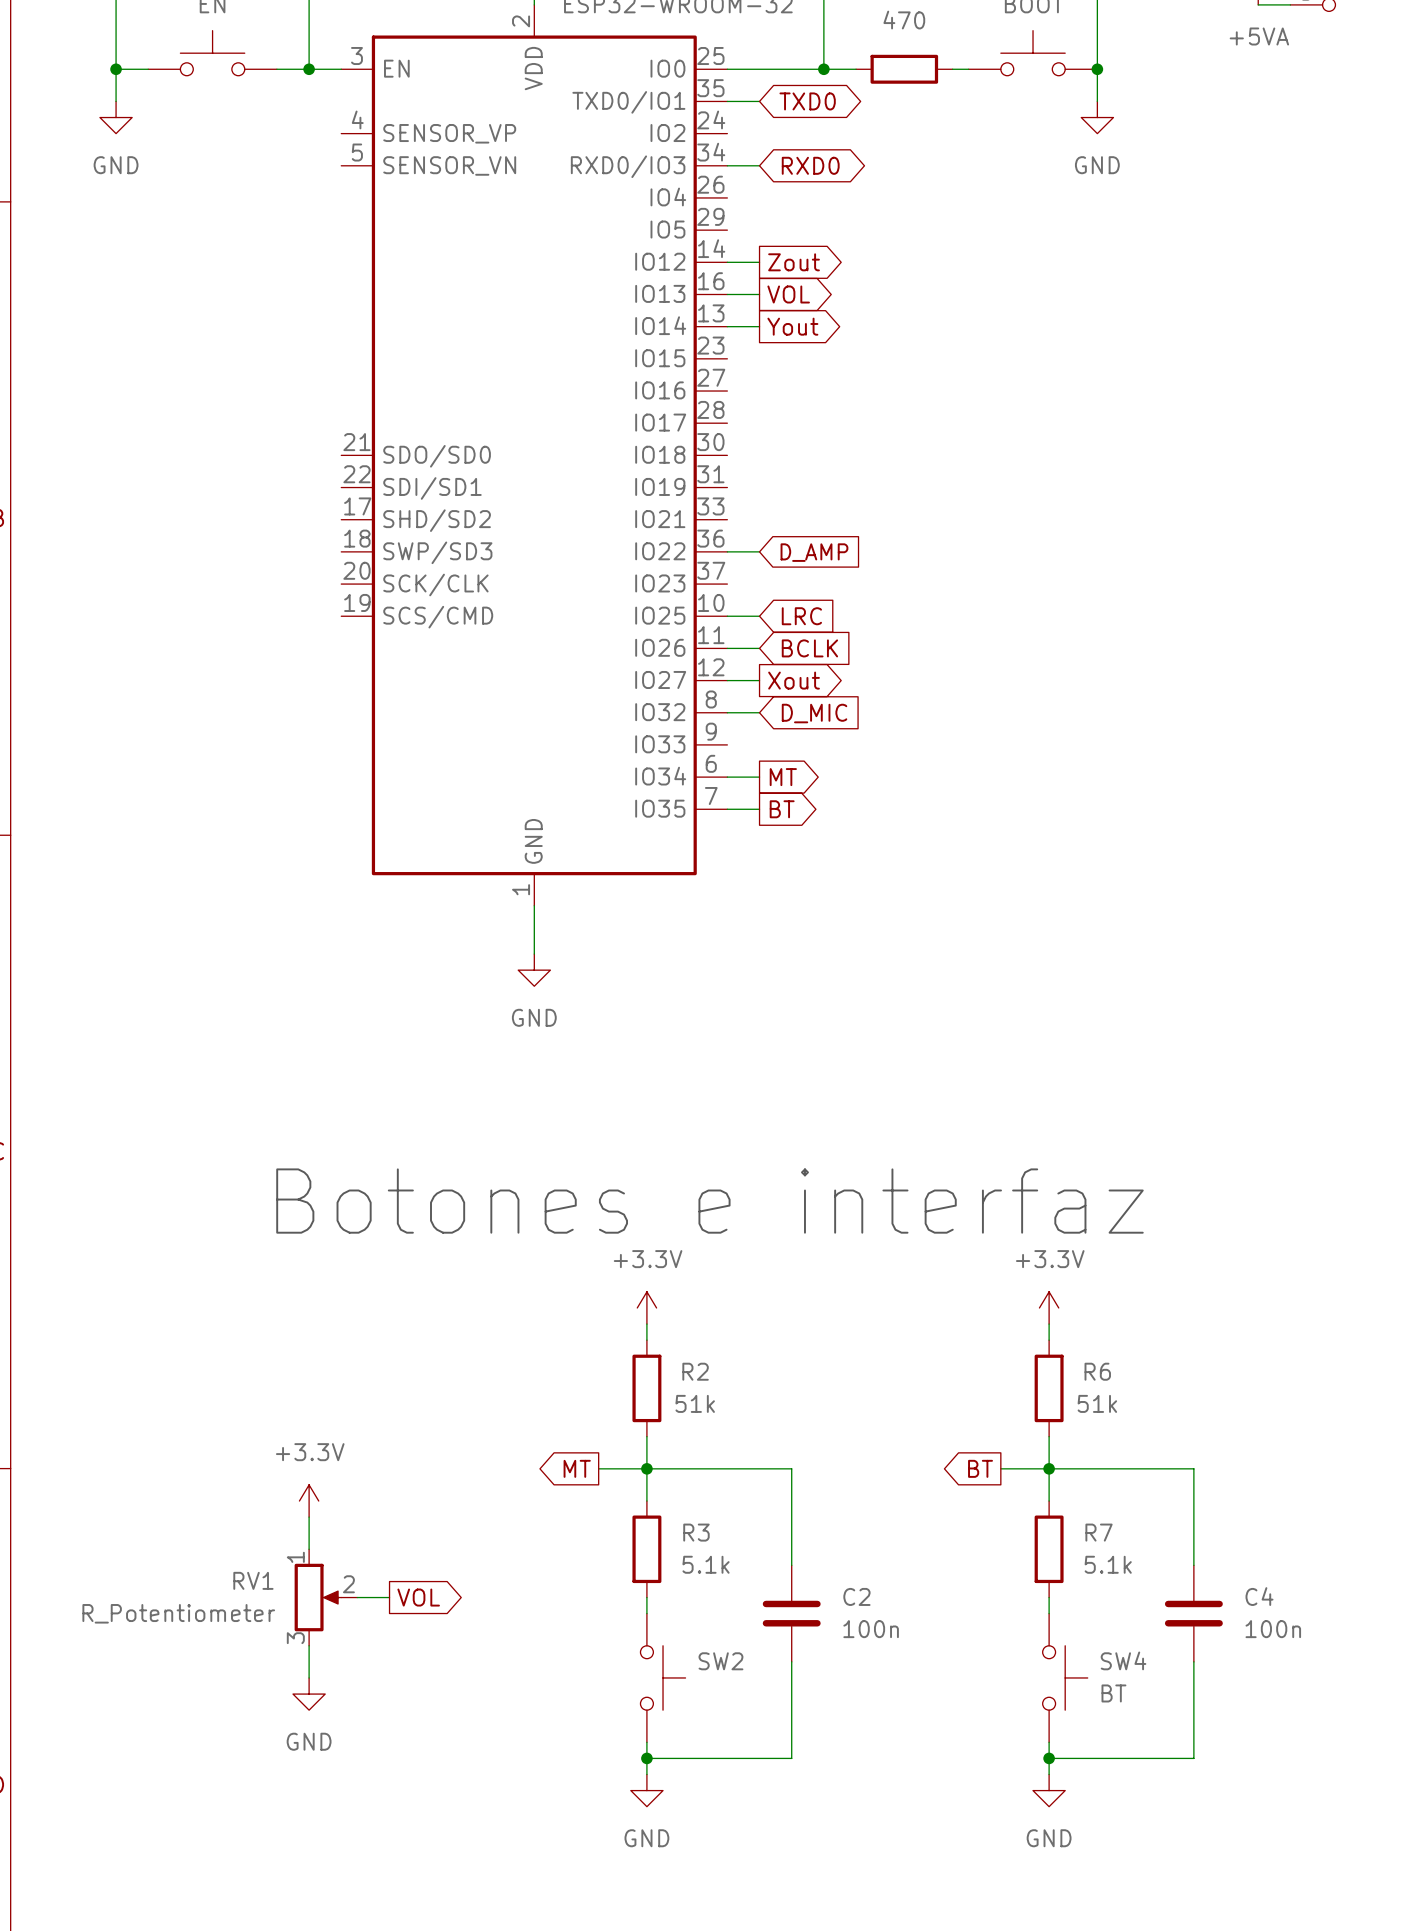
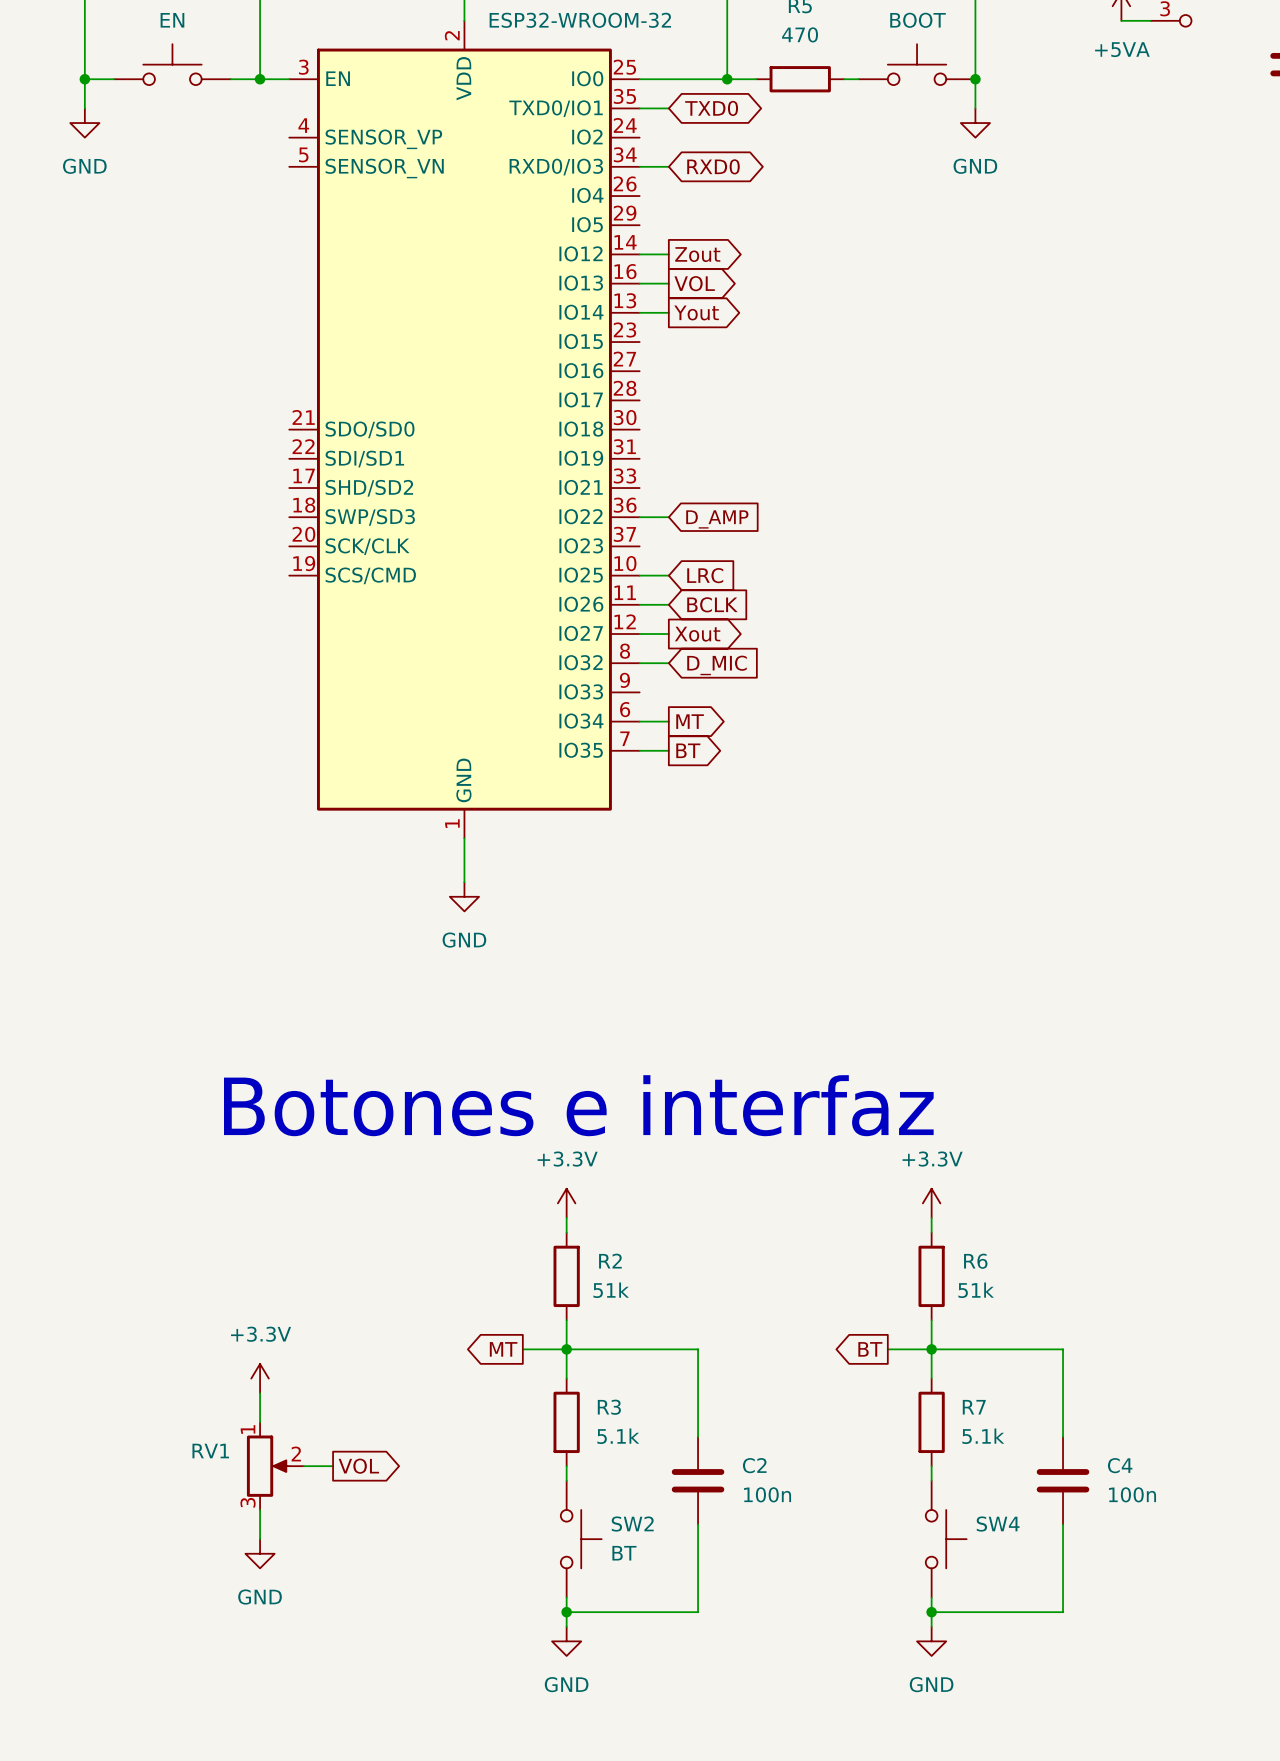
RV1 value: R_Potentiometer (178, 1613) -> none
SW2 value: none -> BT (624, 1553)
SW4 value: BT (1113, 1693) -> none

